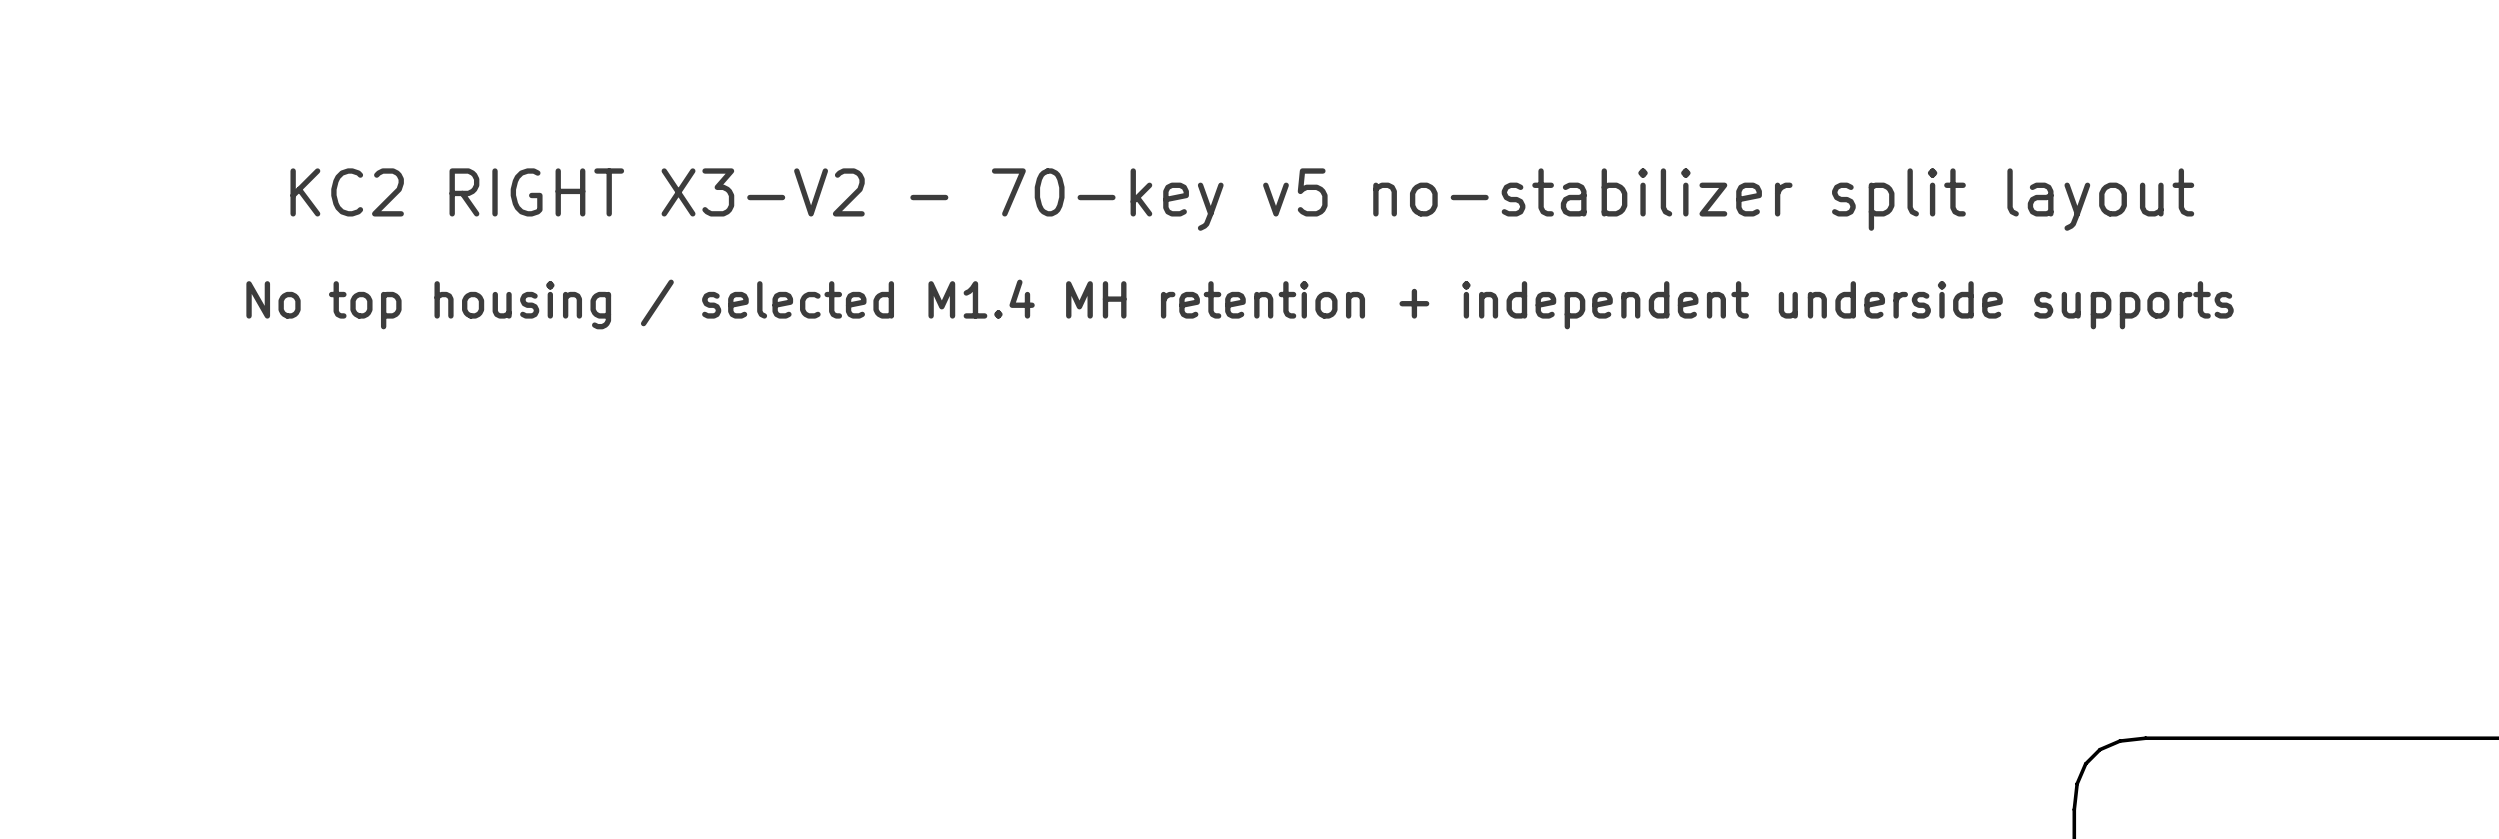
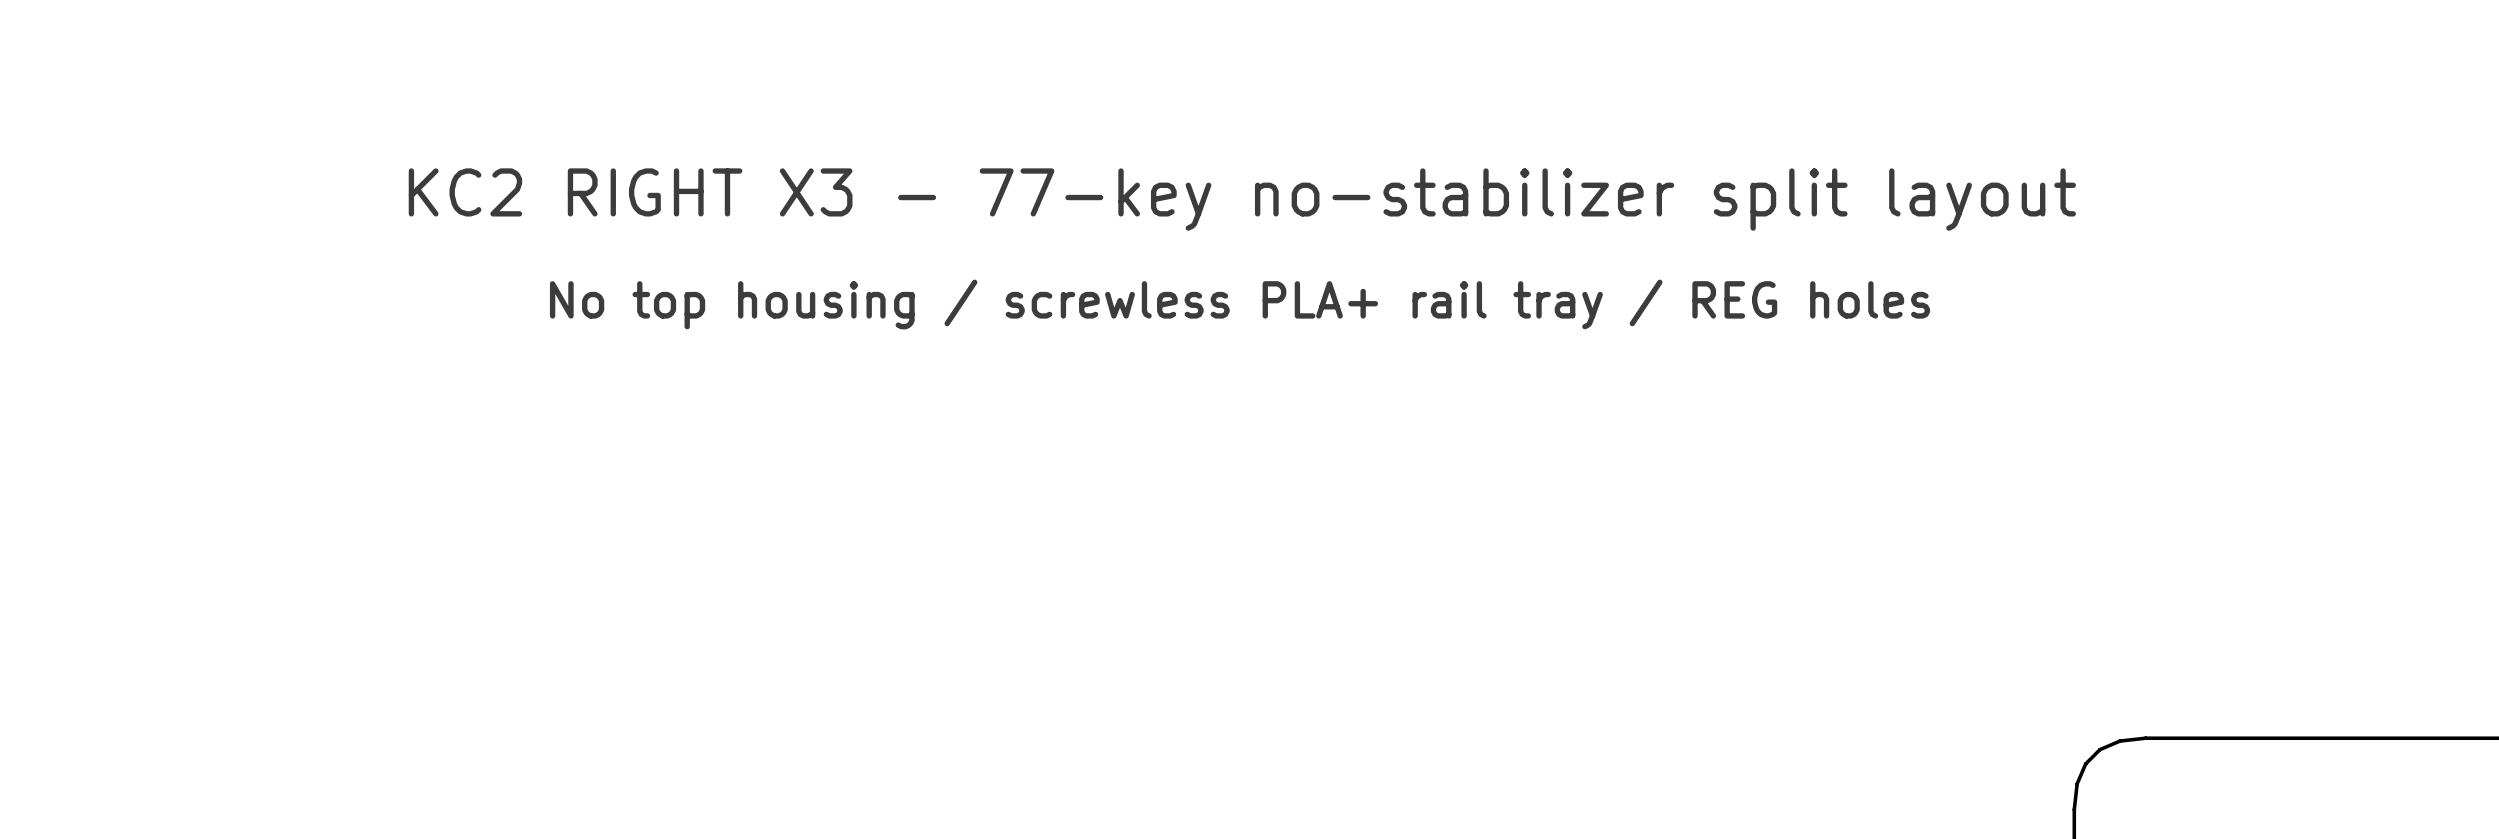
text: KC2 RIGHT X3-V2 - 70-key v5 no-stabilizer split layout (1242, 199) -> KC2 RIGHT X3 - 77-key no-stabilizer split layout (1242, 199)
text: No top housing / selected M1.4 MH retention + independent underside supports (1240, 304) -> No top housing / screwless PLA+ rail tray / REG holes (1240, 304)

